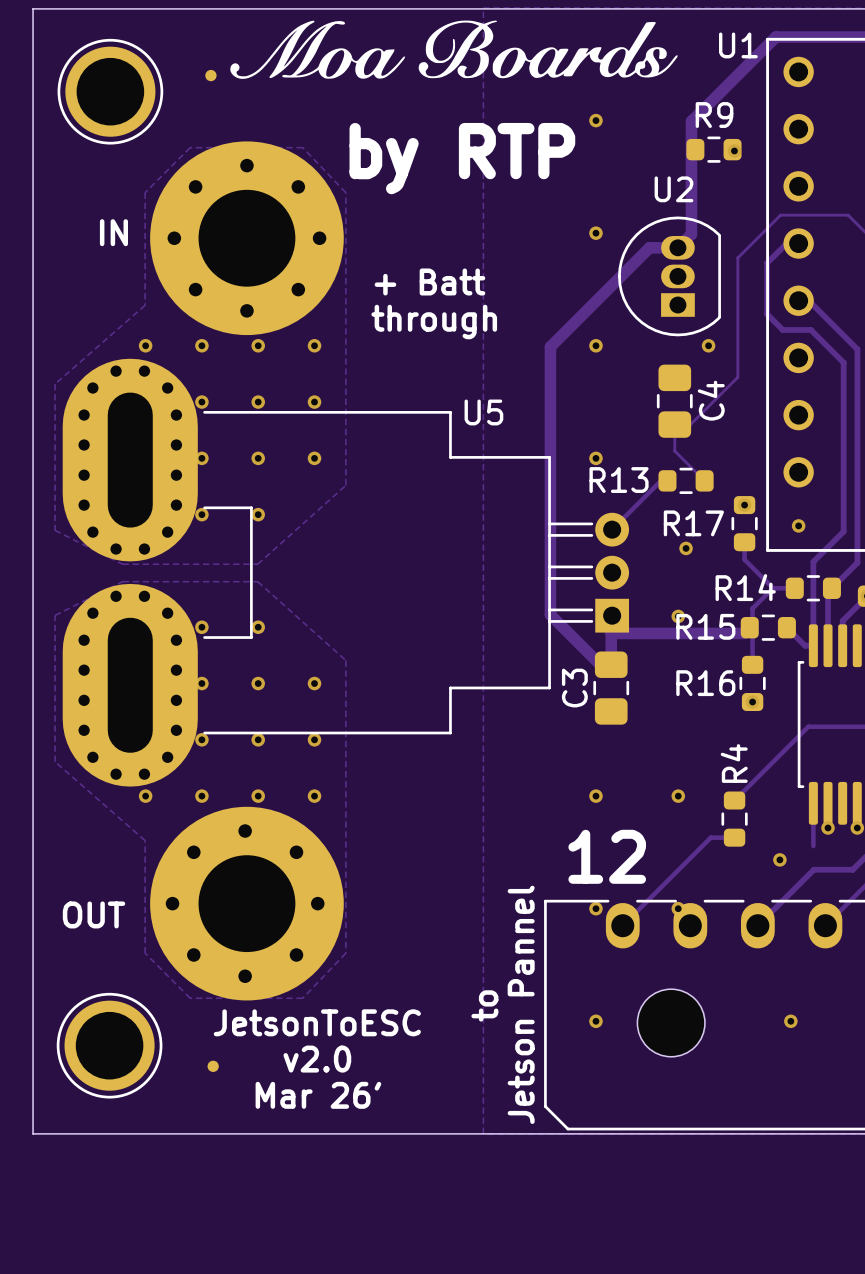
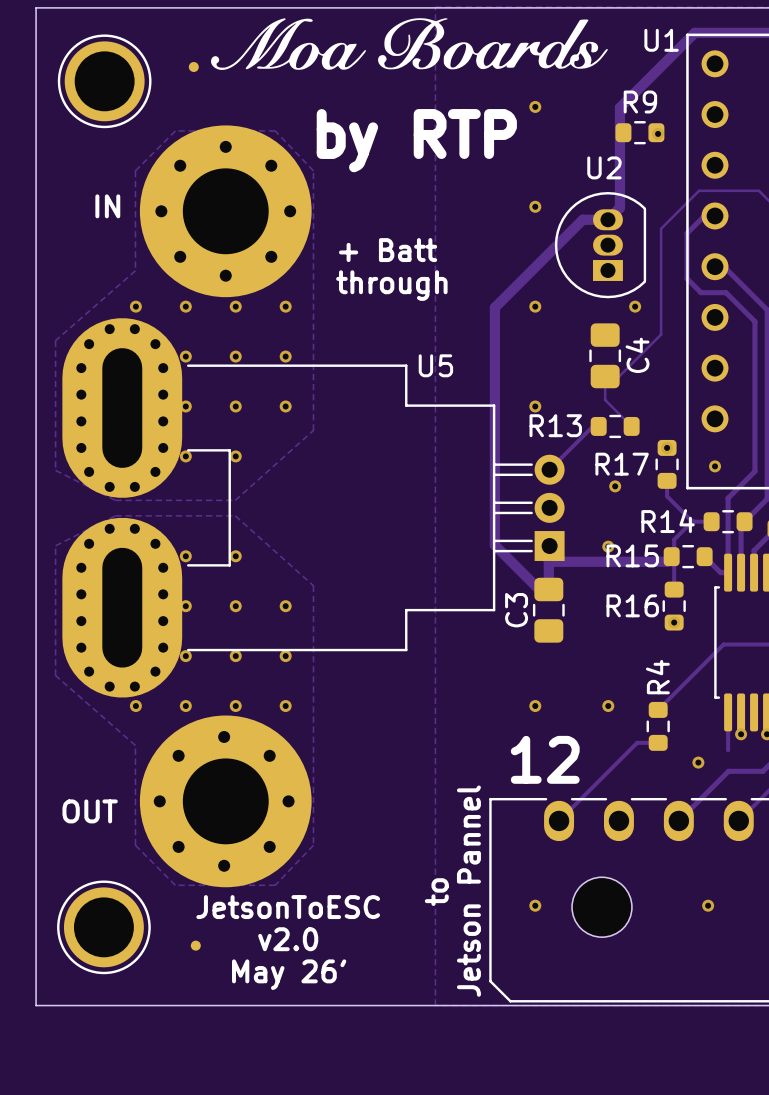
via: (595, 908) -> none
via: (678, 908) -> none
text: Mar 26' (318, 1095) -> May 26' (289, 974)

